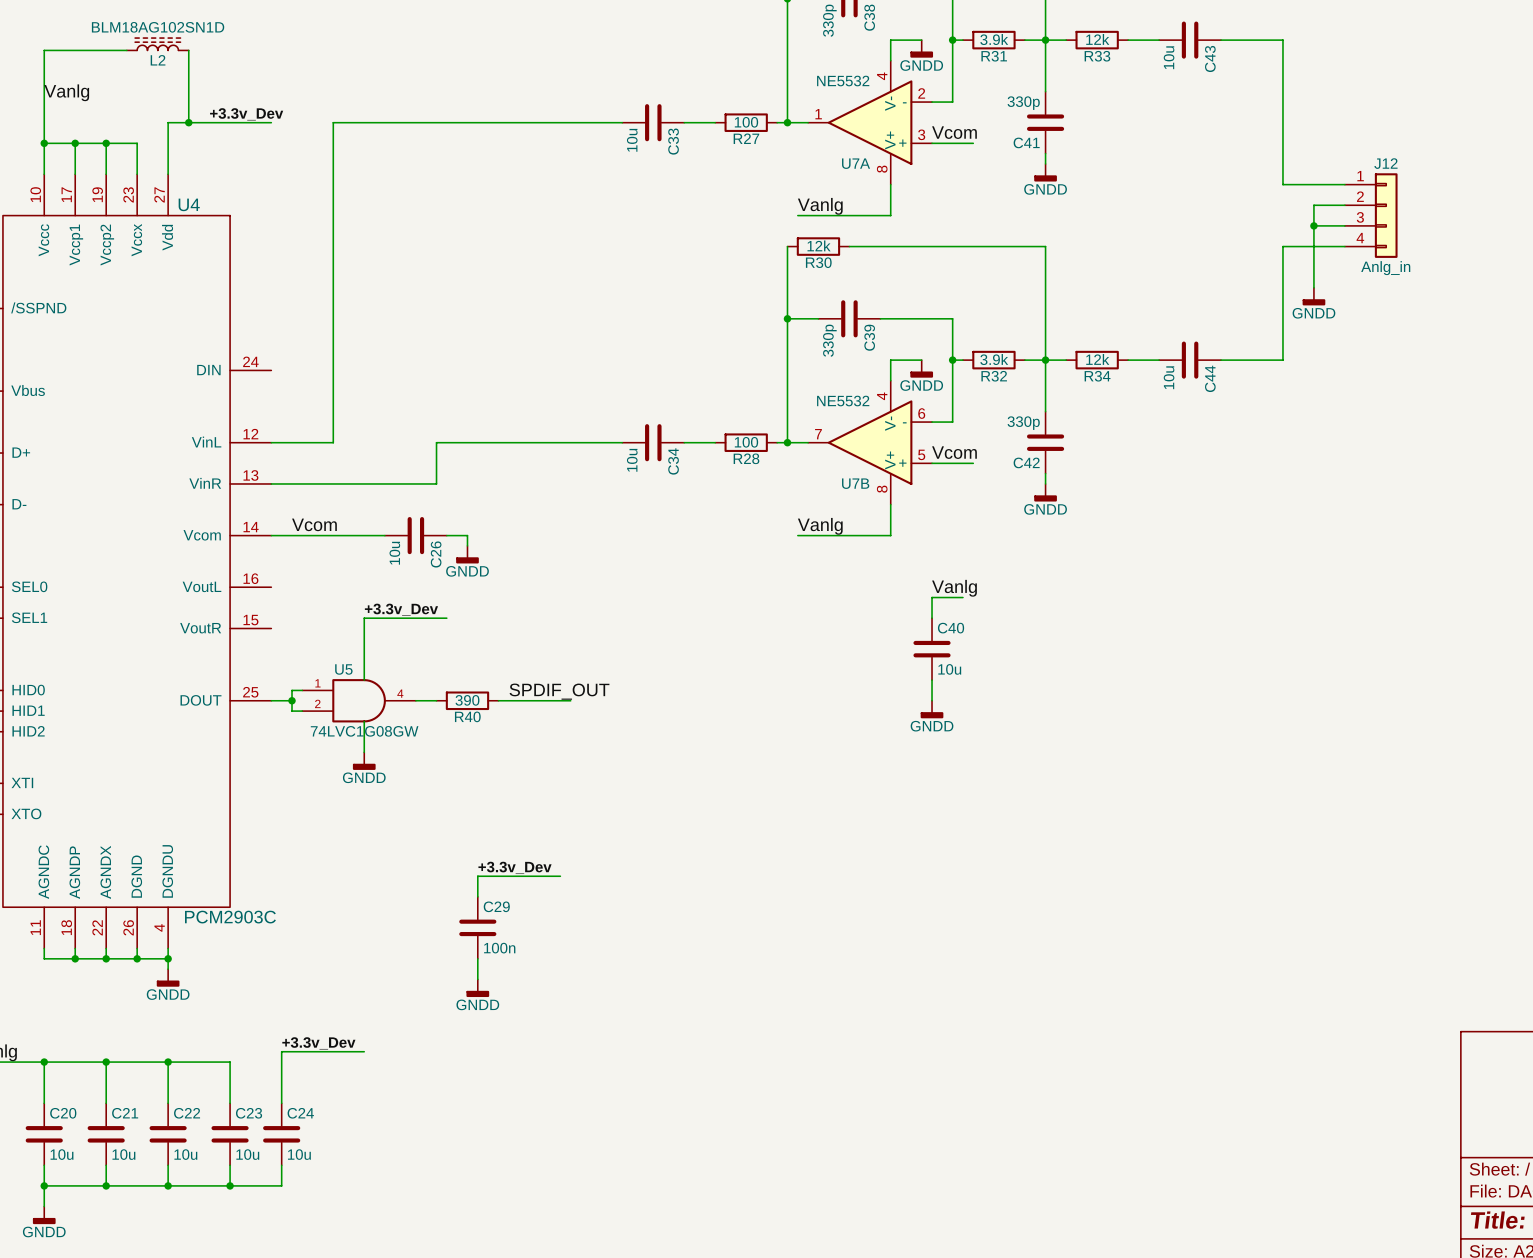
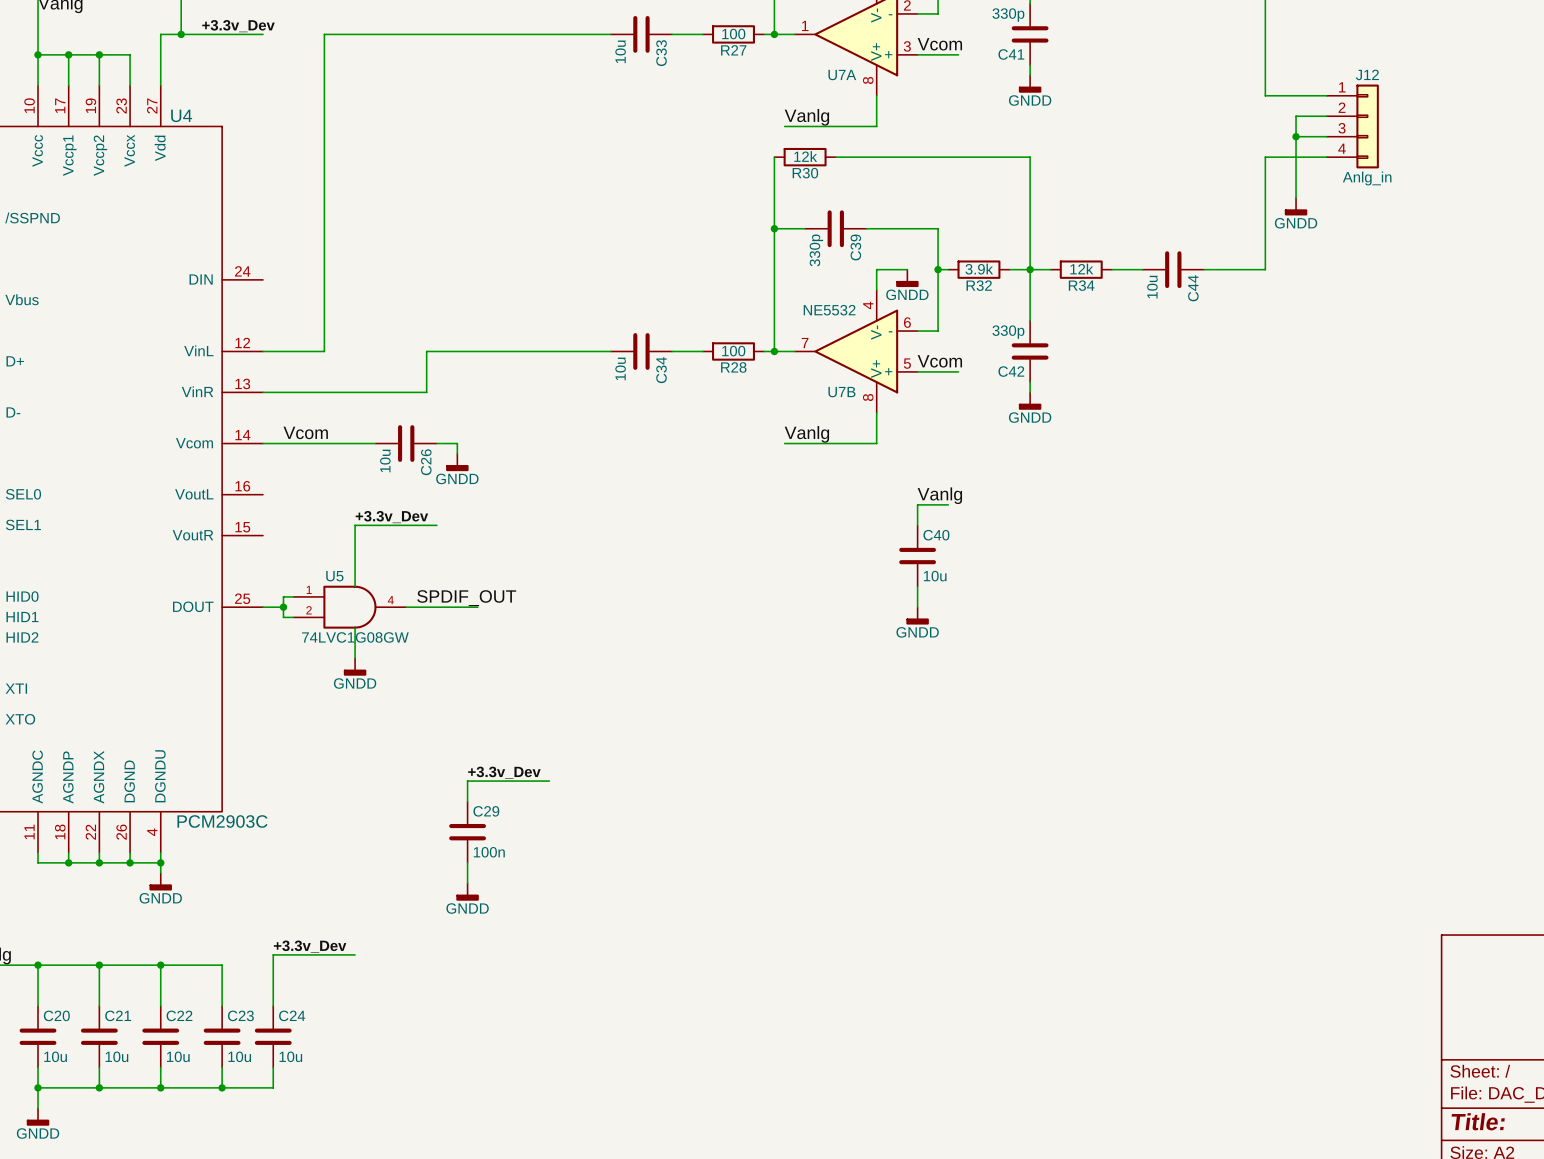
label position: SPDIF_OUT (559, 691) -> SPDIF_OUT (466, 598)
wire: none -> (426, 607) (477, 607)
R40: 390 (467, 700) -> none
wire: (498, 700) (570, 700) -> none

